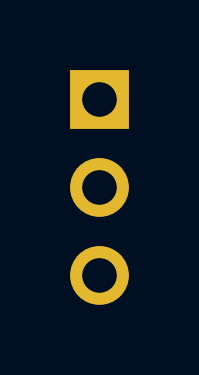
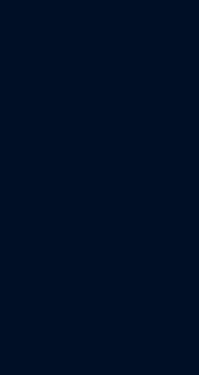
part: (99, 187) -> none

